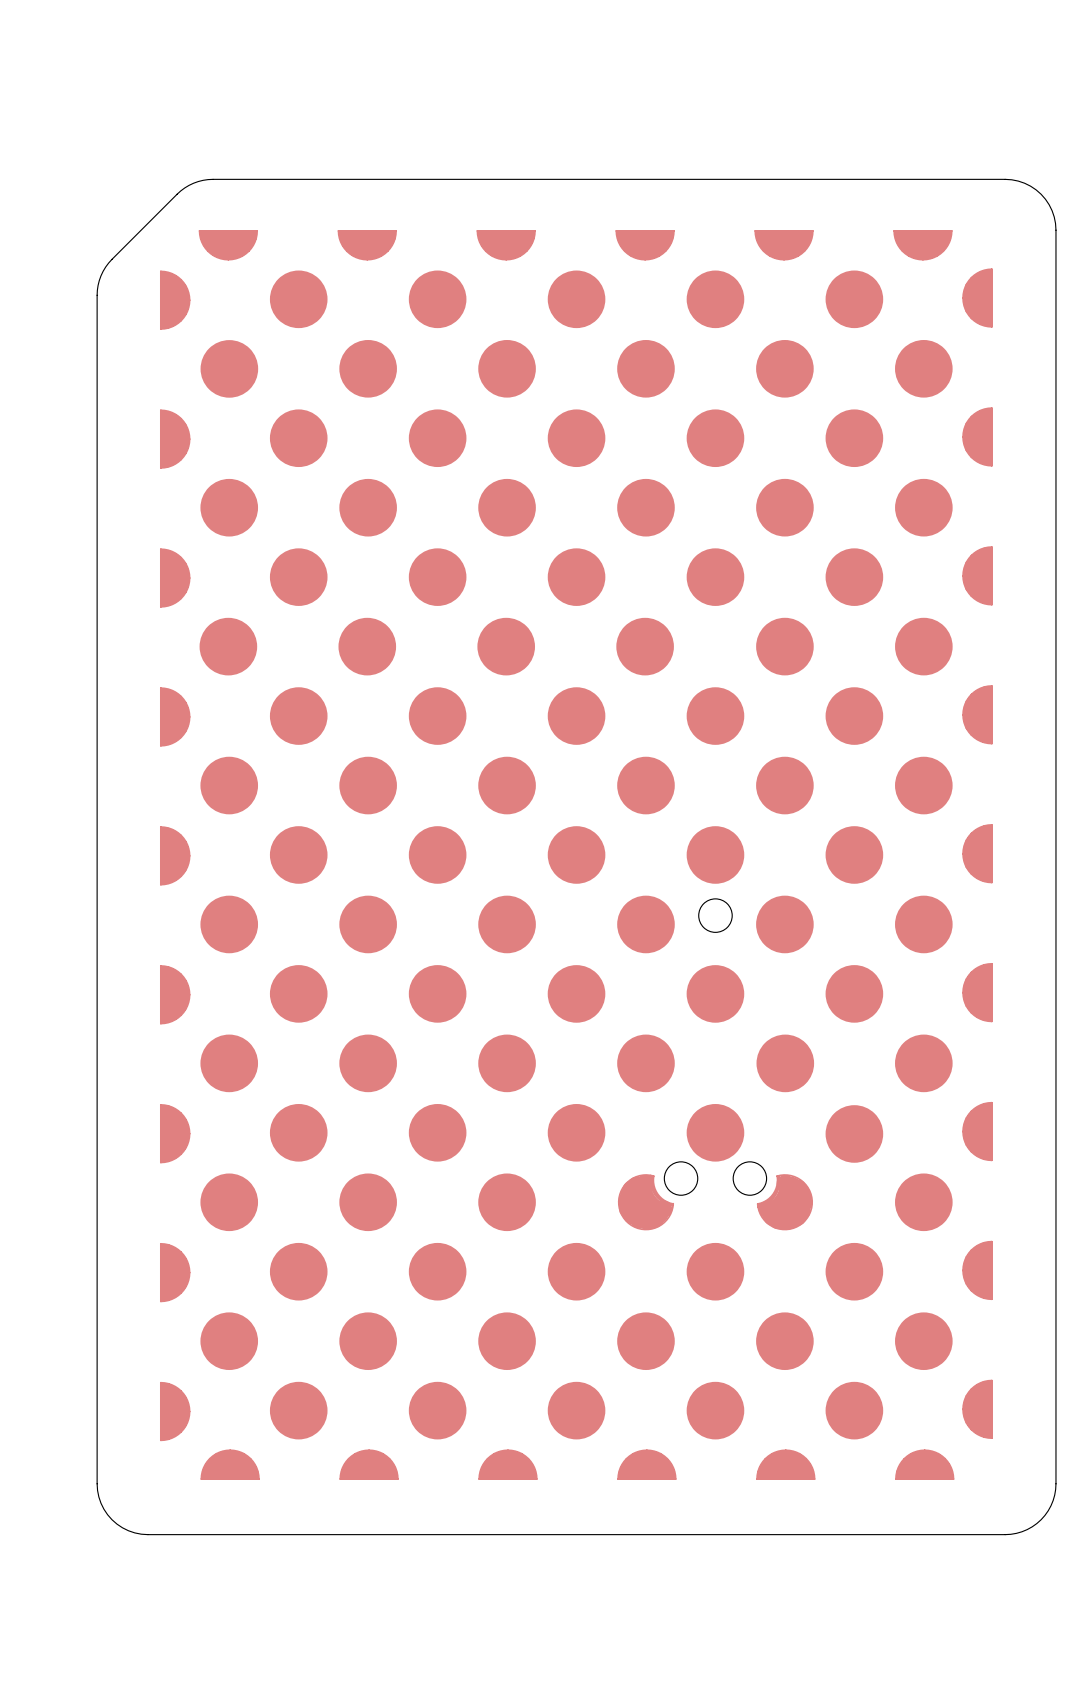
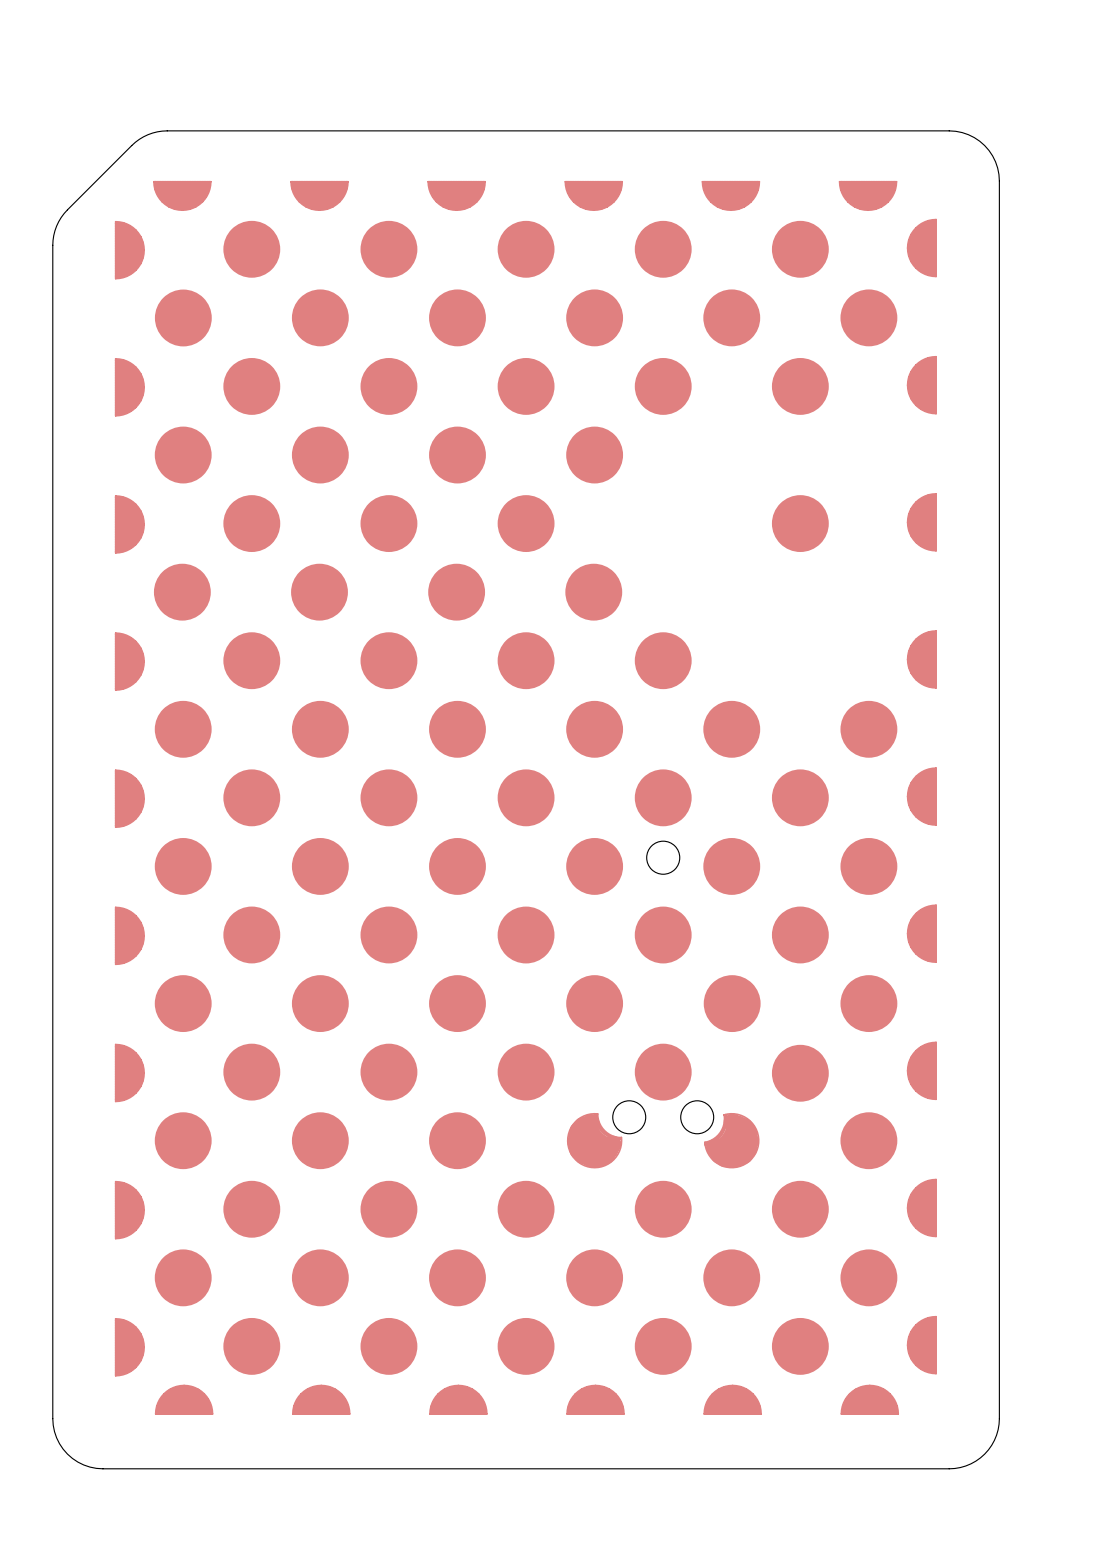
part: (784, 507) -> none
part: (923, 507) -> none
part: (715, 577) -> none
part: (784, 646) -> none
part: (923, 646) -> none
part: (854, 716) -> none
part rotation: 0° (645, 1202) -> 10° counterclockwise (594, 1140)

